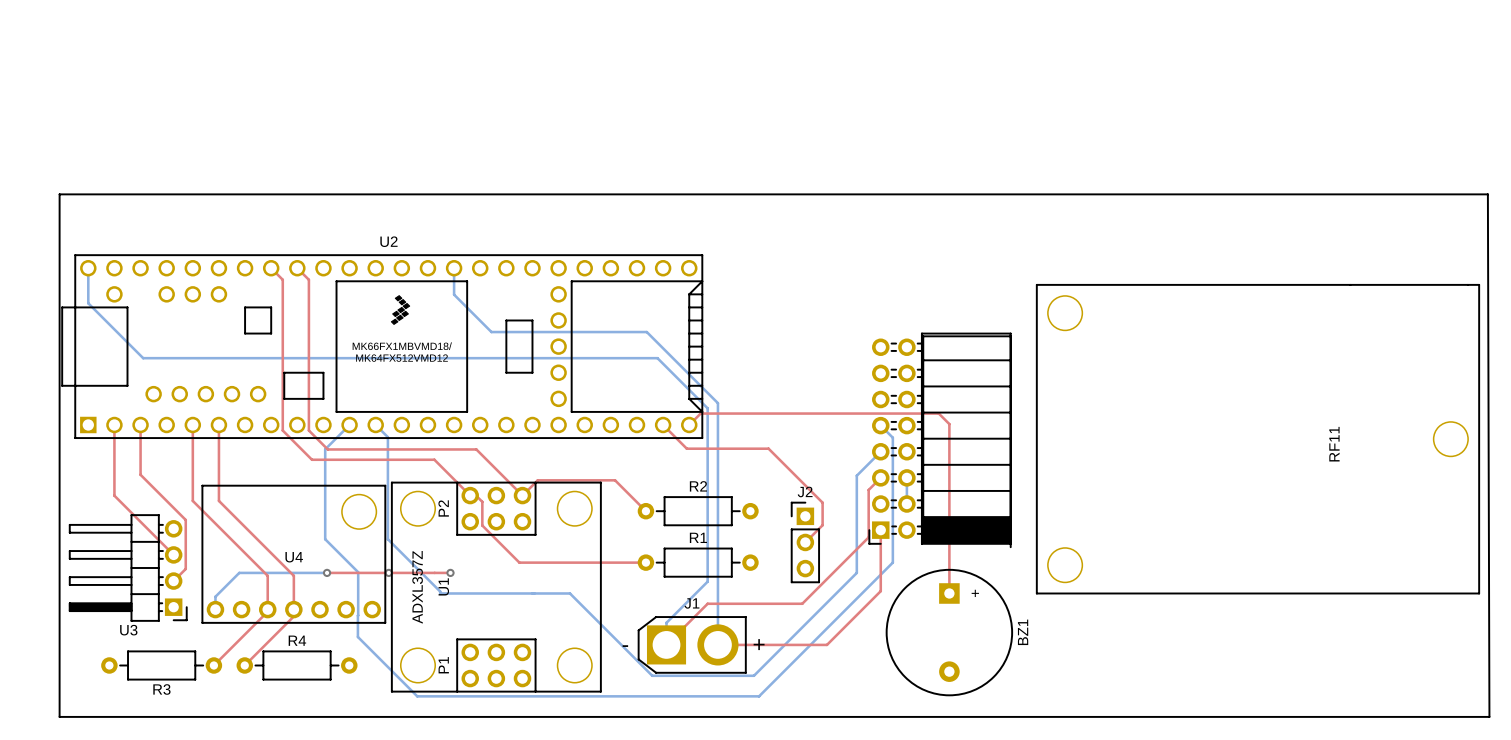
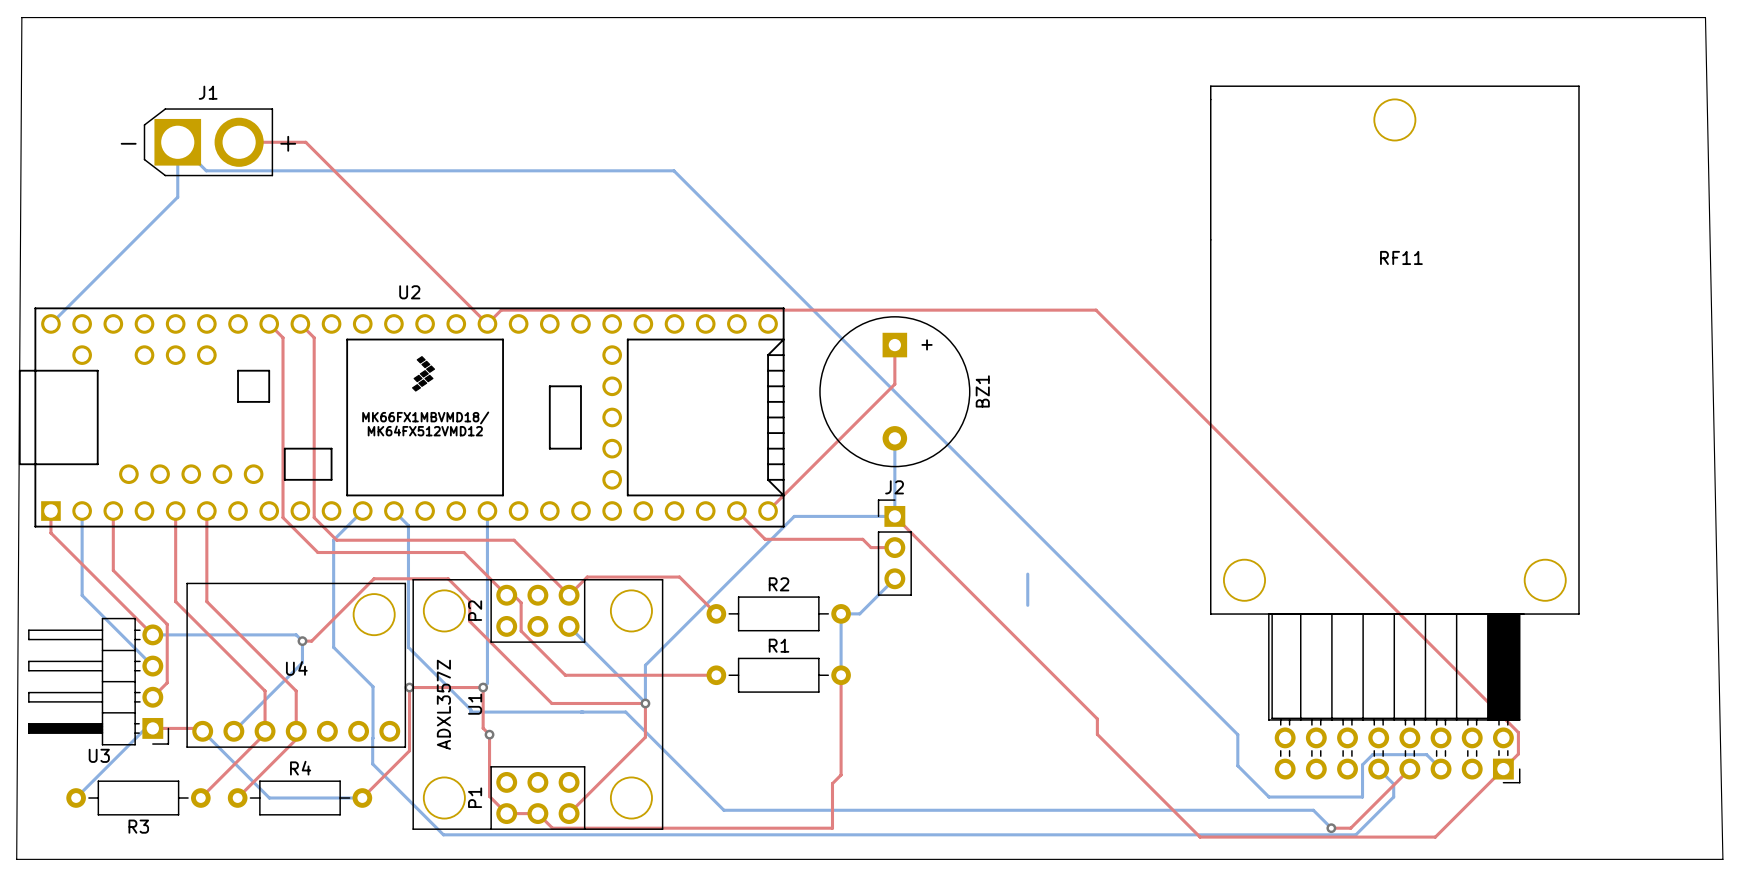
top track: none -> (239, 142) (305, 142) (487, 323) (501, 310) (1096, 310) (1518, 732) (1518, 754) (1507, 765)
bottom track: (88, 268) (88, 303) (143, 358) (657, 358) (707, 408) (707, 581) (666, 622) (666, 644) -> (50, 323) (177, 197) (177, 142) (206, 170) (673, 170) (1237, 734) (1237, 765) (1268, 797) (1362, 797) (1362, 764) (1372, 754) (1426, 754) (1441, 769)
bottom track: (454, 268) (454, 294) (491, 332) (646, 332) (717, 403) (717, 644) -> none
RF11 footprint: [868, 284, 1480, 595] -> [1210, 85, 1580, 784]
bottom track: none -> (894, 438) (894, 516)
top track: (700, 413) (938, 413) (949, 424) (949, 593) -> (781, 497) (894, 384) (894, 345)
top track: none -> (50, 511) (50, 533) (152, 634)
bottom track: none -> (82, 511) (82, 595) (152, 666)
top track: (114, 424) (114, 495) (173, 554) -> none
bottom track: none -> (487, 511) (487, 683) (483, 687)
bottom track: (880, 425) (892, 437) (892, 562) (759, 696) -> (1378, 769) (1393, 784) (1393, 797) (1355, 834) (851, 834)
bottom track: none -> (894, 516) (794, 516) (645, 665) (645, 703)
top track: none -> (894, 516) (1097, 718) (1097, 734) (1200, 837) (1435, 837) (1503, 769)
RF11 name position: RF11 (1334, 444) -> RF11 (1401, 257)
bottom track: (880, 451) (856, 475) (856, 572) (753, 675) -> (1331, 828) (1313, 810) (845, 810)
top track: (775, 455) (822, 502) (822, 525) (805, 542) -> (871, 547) (894, 547)
top track: (880, 477) (868, 489) (868, 537) (802, 603) (707, 603) (666, 644) -> none
bottom track: none -> (894, 578) (859, 613) (841, 613) (841, 675)
bottom track: none -> (569, 626) (645, 702)
bottom track: none -> (152, 634) (296, 634) (302, 641) (302, 662) (233, 731)
top track: (880, 530) (880, 591) (826, 644) (717, 644) -> none
top track: none -> (302, 641) (311, 641) (374, 578) (448, 578) (469, 600) (469, 621) (551, 703) (645, 703) (645, 737) (569, 813) (569, 811)
J2 position: (805, 542) -> (894, 547)
top track: none -> (841, 675) (841, 775) (832, 783) (832, 828) (552, 828) (537, 813) (506, 813) (489, 796) (489, 734) (483, 728) (483, 687)
bottom track: (327, 572) (239, 572) (215, 596) (215, 609) -> none
top track: (327, 572) (388, 572) -> (362, 798) (409, 750) (409, 687)
via position: (327, 572) -> (302, 641)
via: none -> (645, 703)
bottom track: none -> (152, 728) (145, 728) (76, 798)
top track: none -> (152, 728) (199, 728) (202, 731)
bottom track: none -> (199, 728) (269, 798) (362, 798)
via: none -> (489, 734)
BZ1 position: (949, 632) -> (894, 391)
top track: none -> (1409, 769) (1350, 828) (1331, 828)
J1 position: (692, 644) -> (208, 142)
via: none -> (1331, 828)
board edge: (59, 716) (59, 194) (1487, 194) (1489, 716) -> (16, 859) (21, 17) (1705, 17) (1722, 859)

